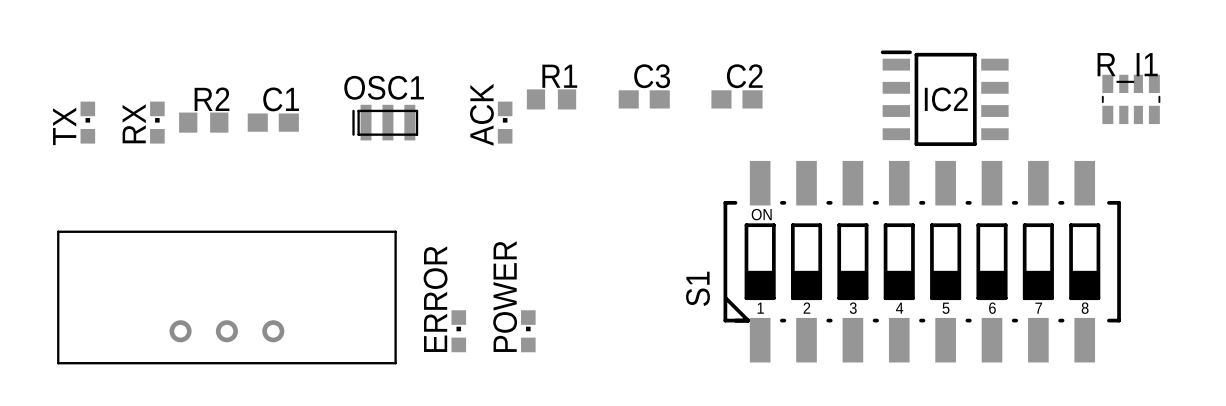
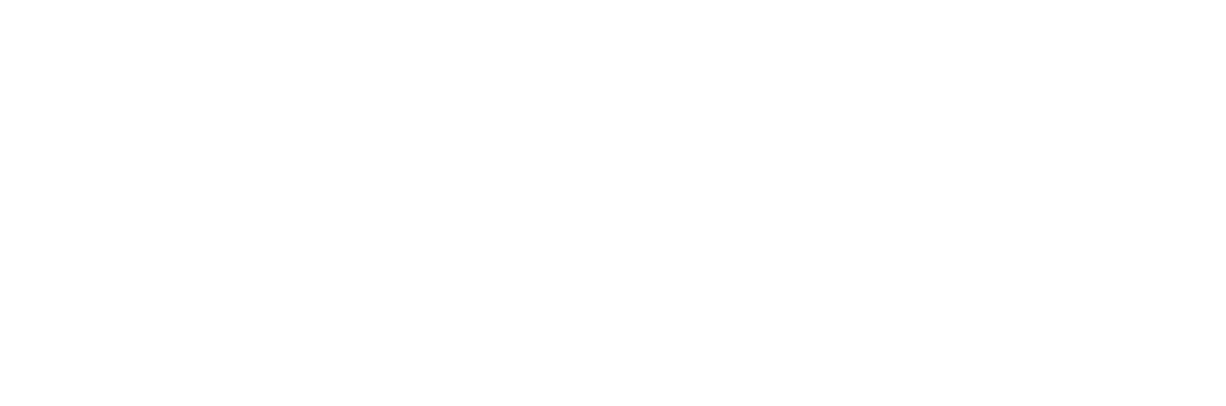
IC2: (944, 98) -> none
R1: (551, 99) -> none
C3: (644, 99) -> none
C2: (736, 99) -> none
R_I1: (1131, 99) -> none
TX: (87, 122) -> none
RX: (157, 122) -> none
R2: (203, 122) -> none
C1: (273, 122) -> none
OSC1: (385, 122) -> none
ACK: (505, 122) -> none
S1: (922, 261) -> none
part: (226, 297) -> none
ERROR: (458, 331) -> none
POWER: (528, 331) -> none

